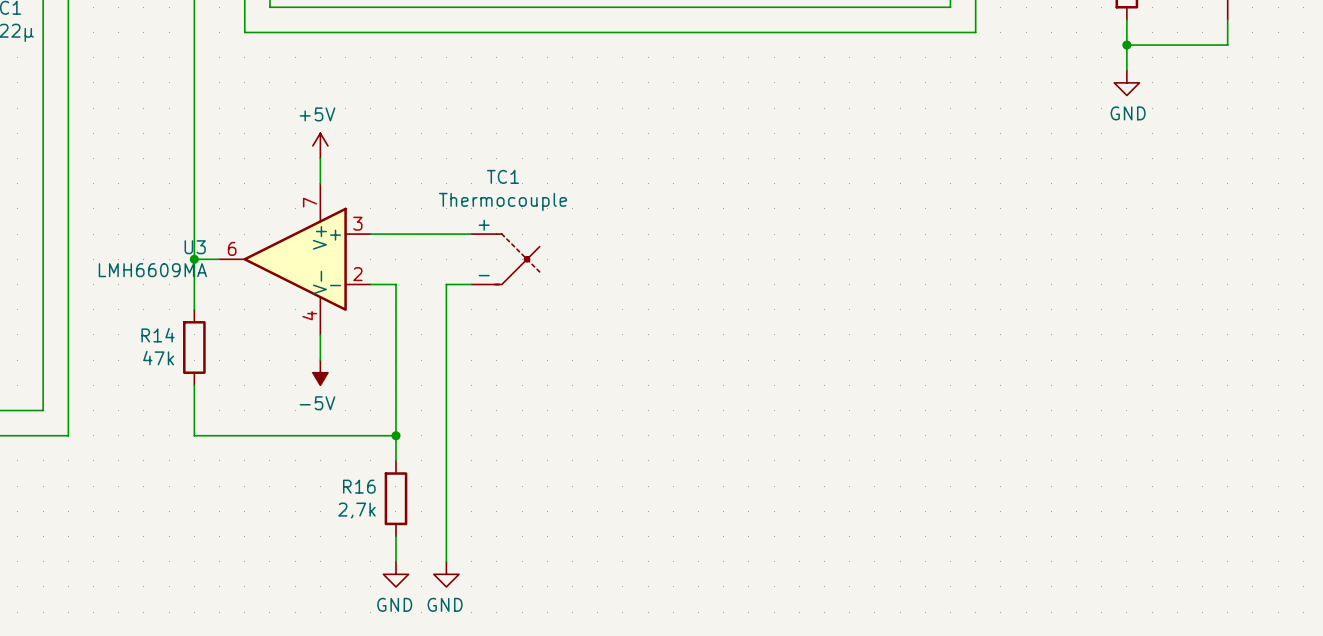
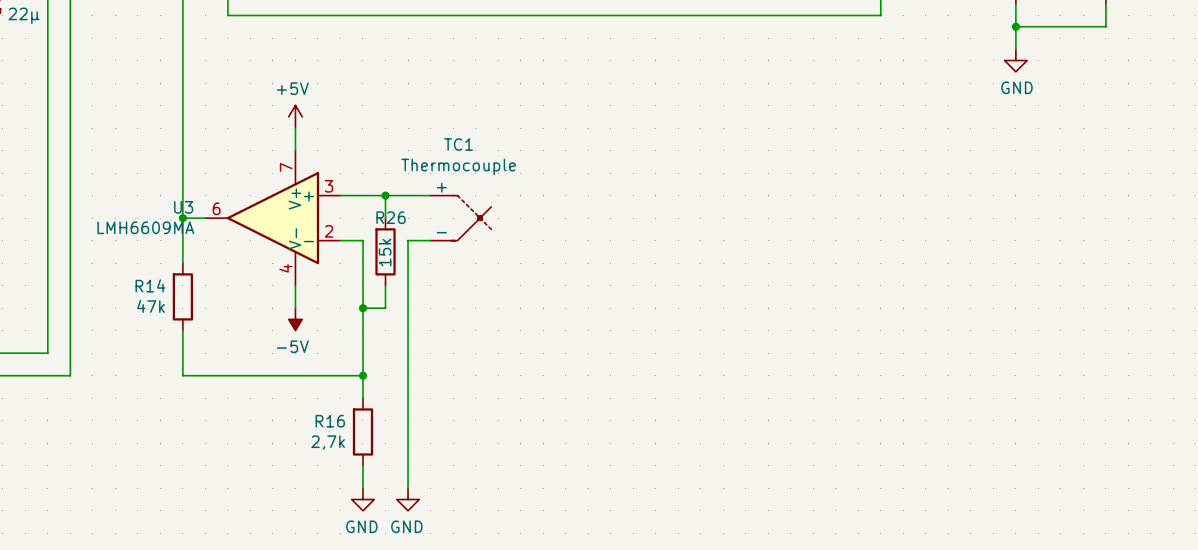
wire: none -> (385, 195) (385, 218)
junction: none -> (385, 195)
R26: none -> 15k (385, 251)
wire: none -> (385, 285) (385, 308) (362, 308)
junction: none -> (362, 308)

